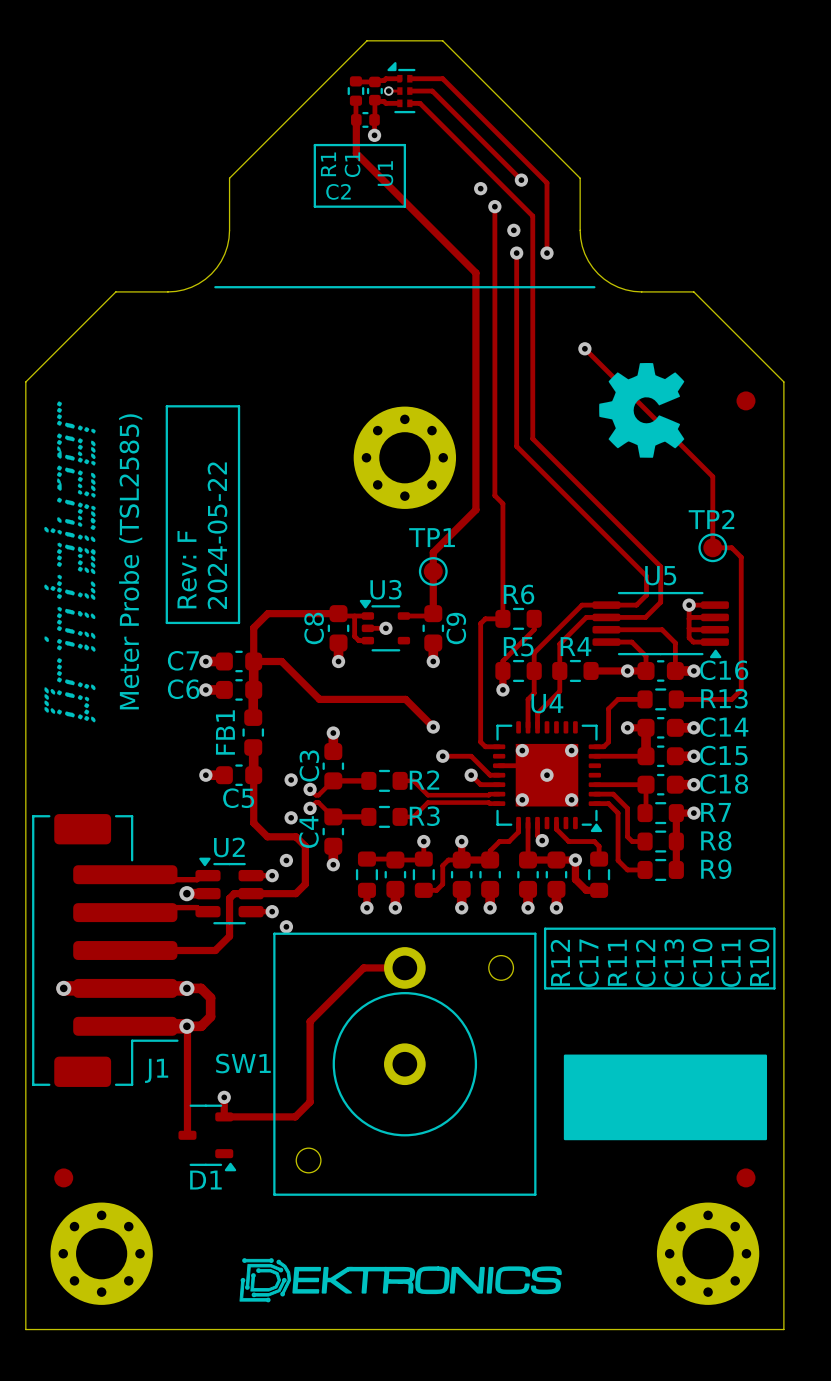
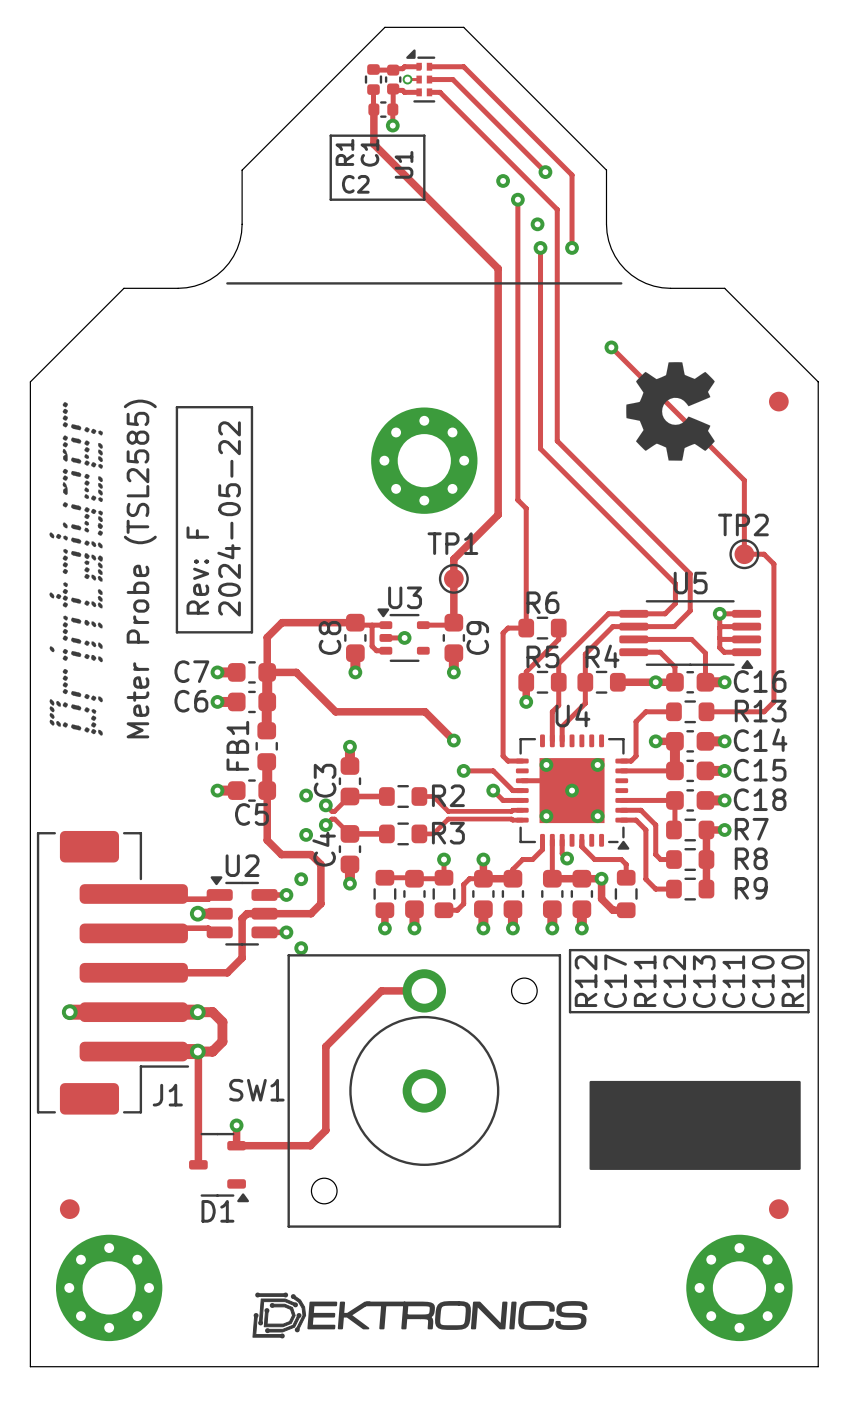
C10 name: C10 (702, 962) -> C11 (733, 981)
C11 name: C11 (731, 963) -> C10 (763, 981)

